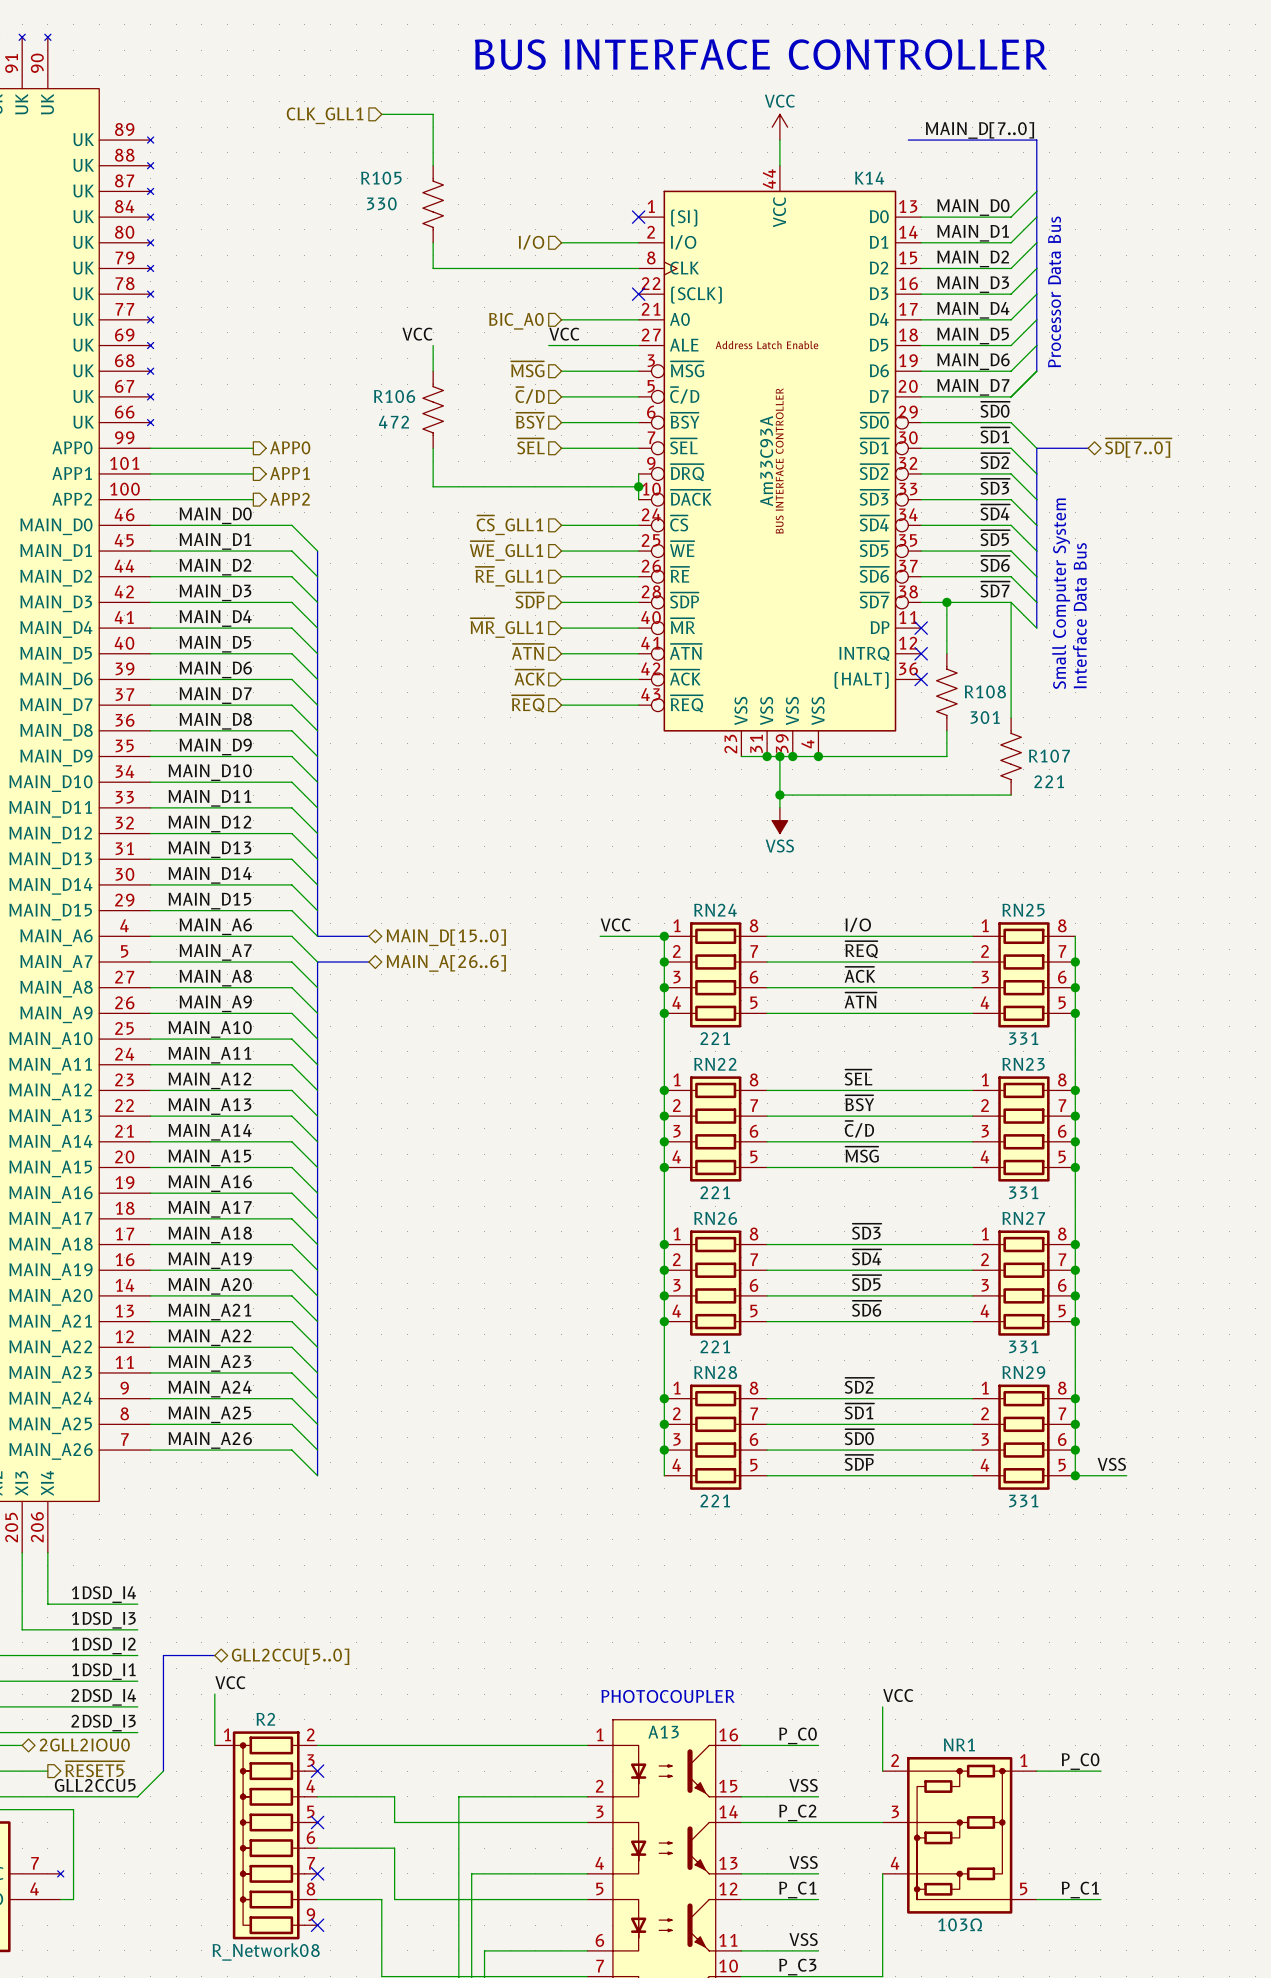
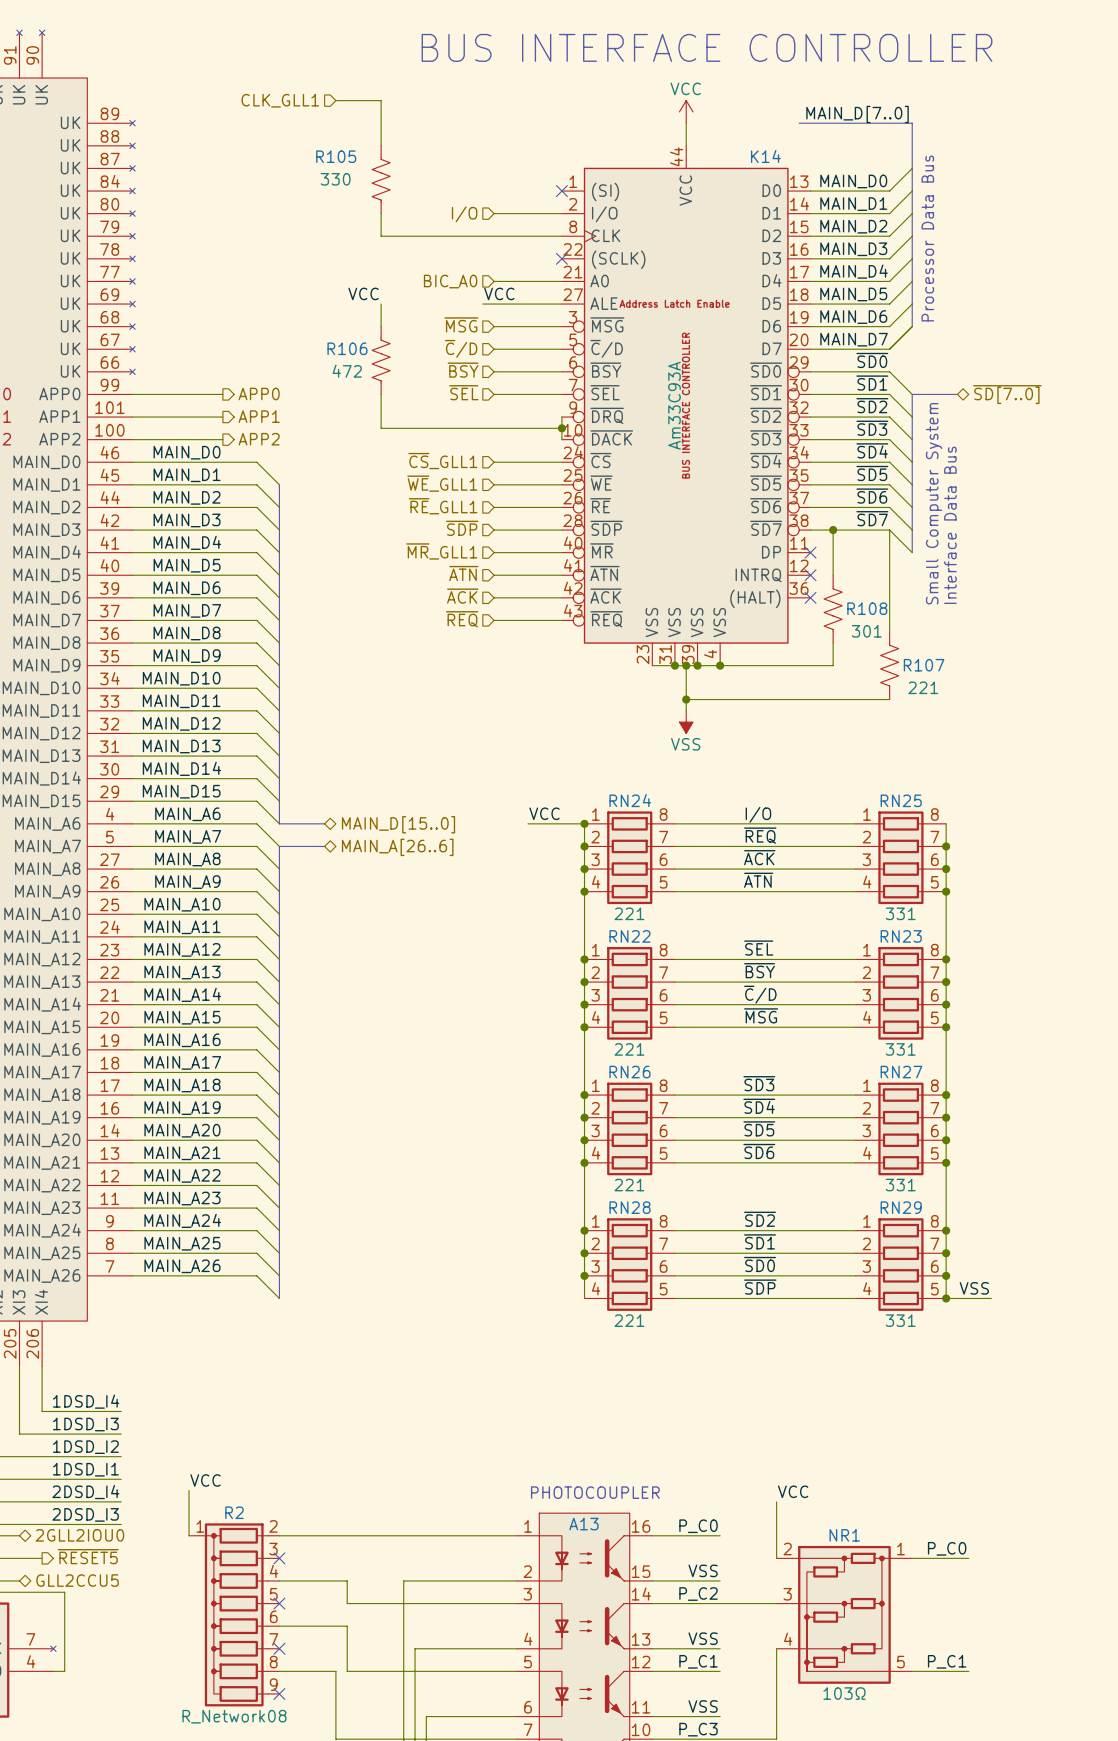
bus: (214, 1655) (163, 1655) (163, 1771) -> none
hierarchical label: GLL2CCU[5..0] (290, 1656) -> none
wire: (163, 1771) (137, 1796) (22, 1796) -> none
label: GLL2CCU5 (95, 1785) -> none
hierarchical label: none -> GLL2CCU5 (77, 1580)

